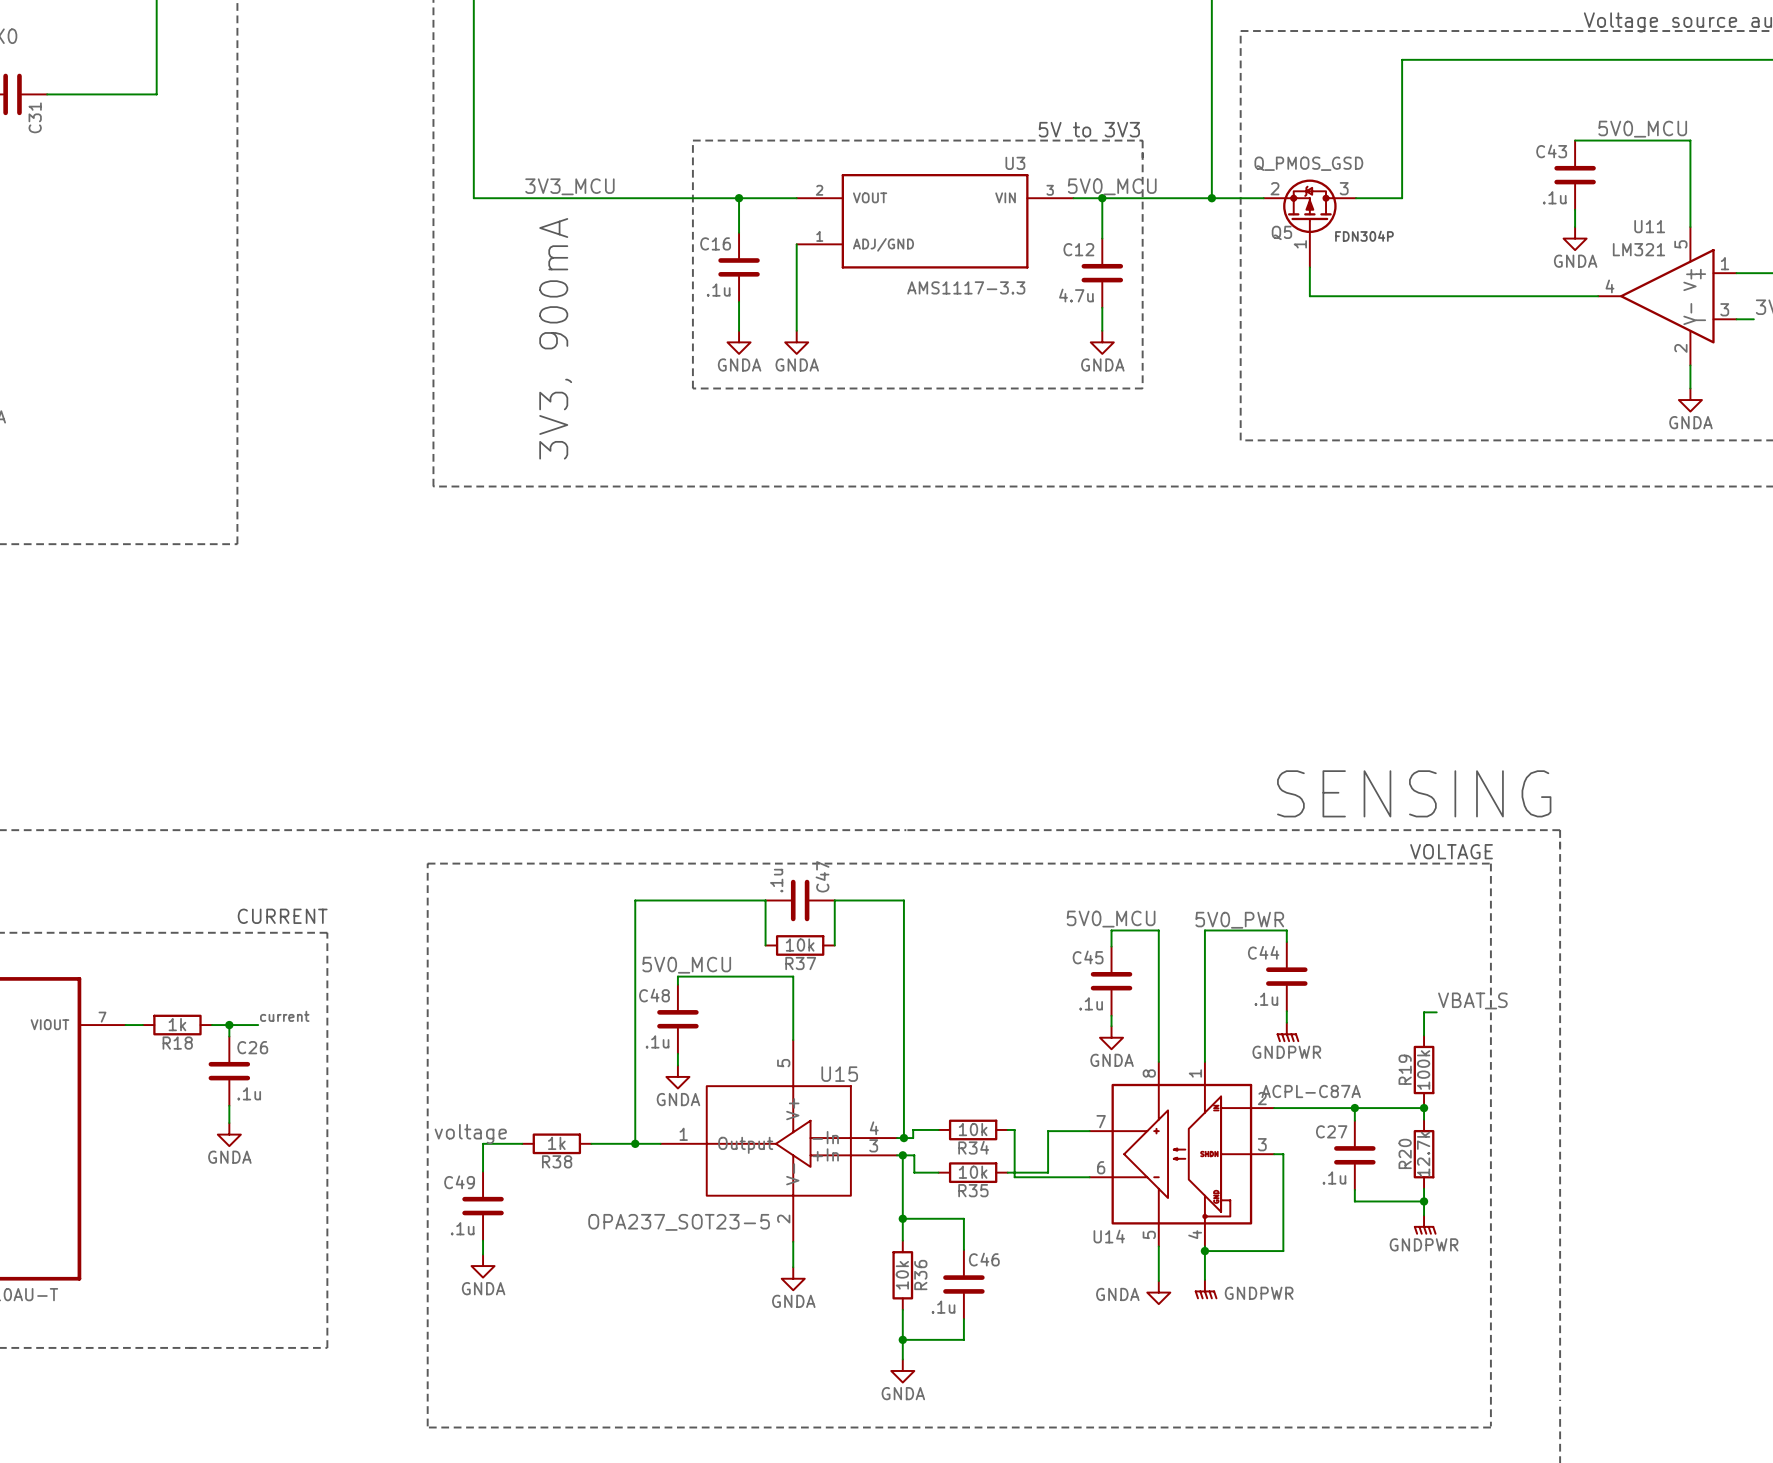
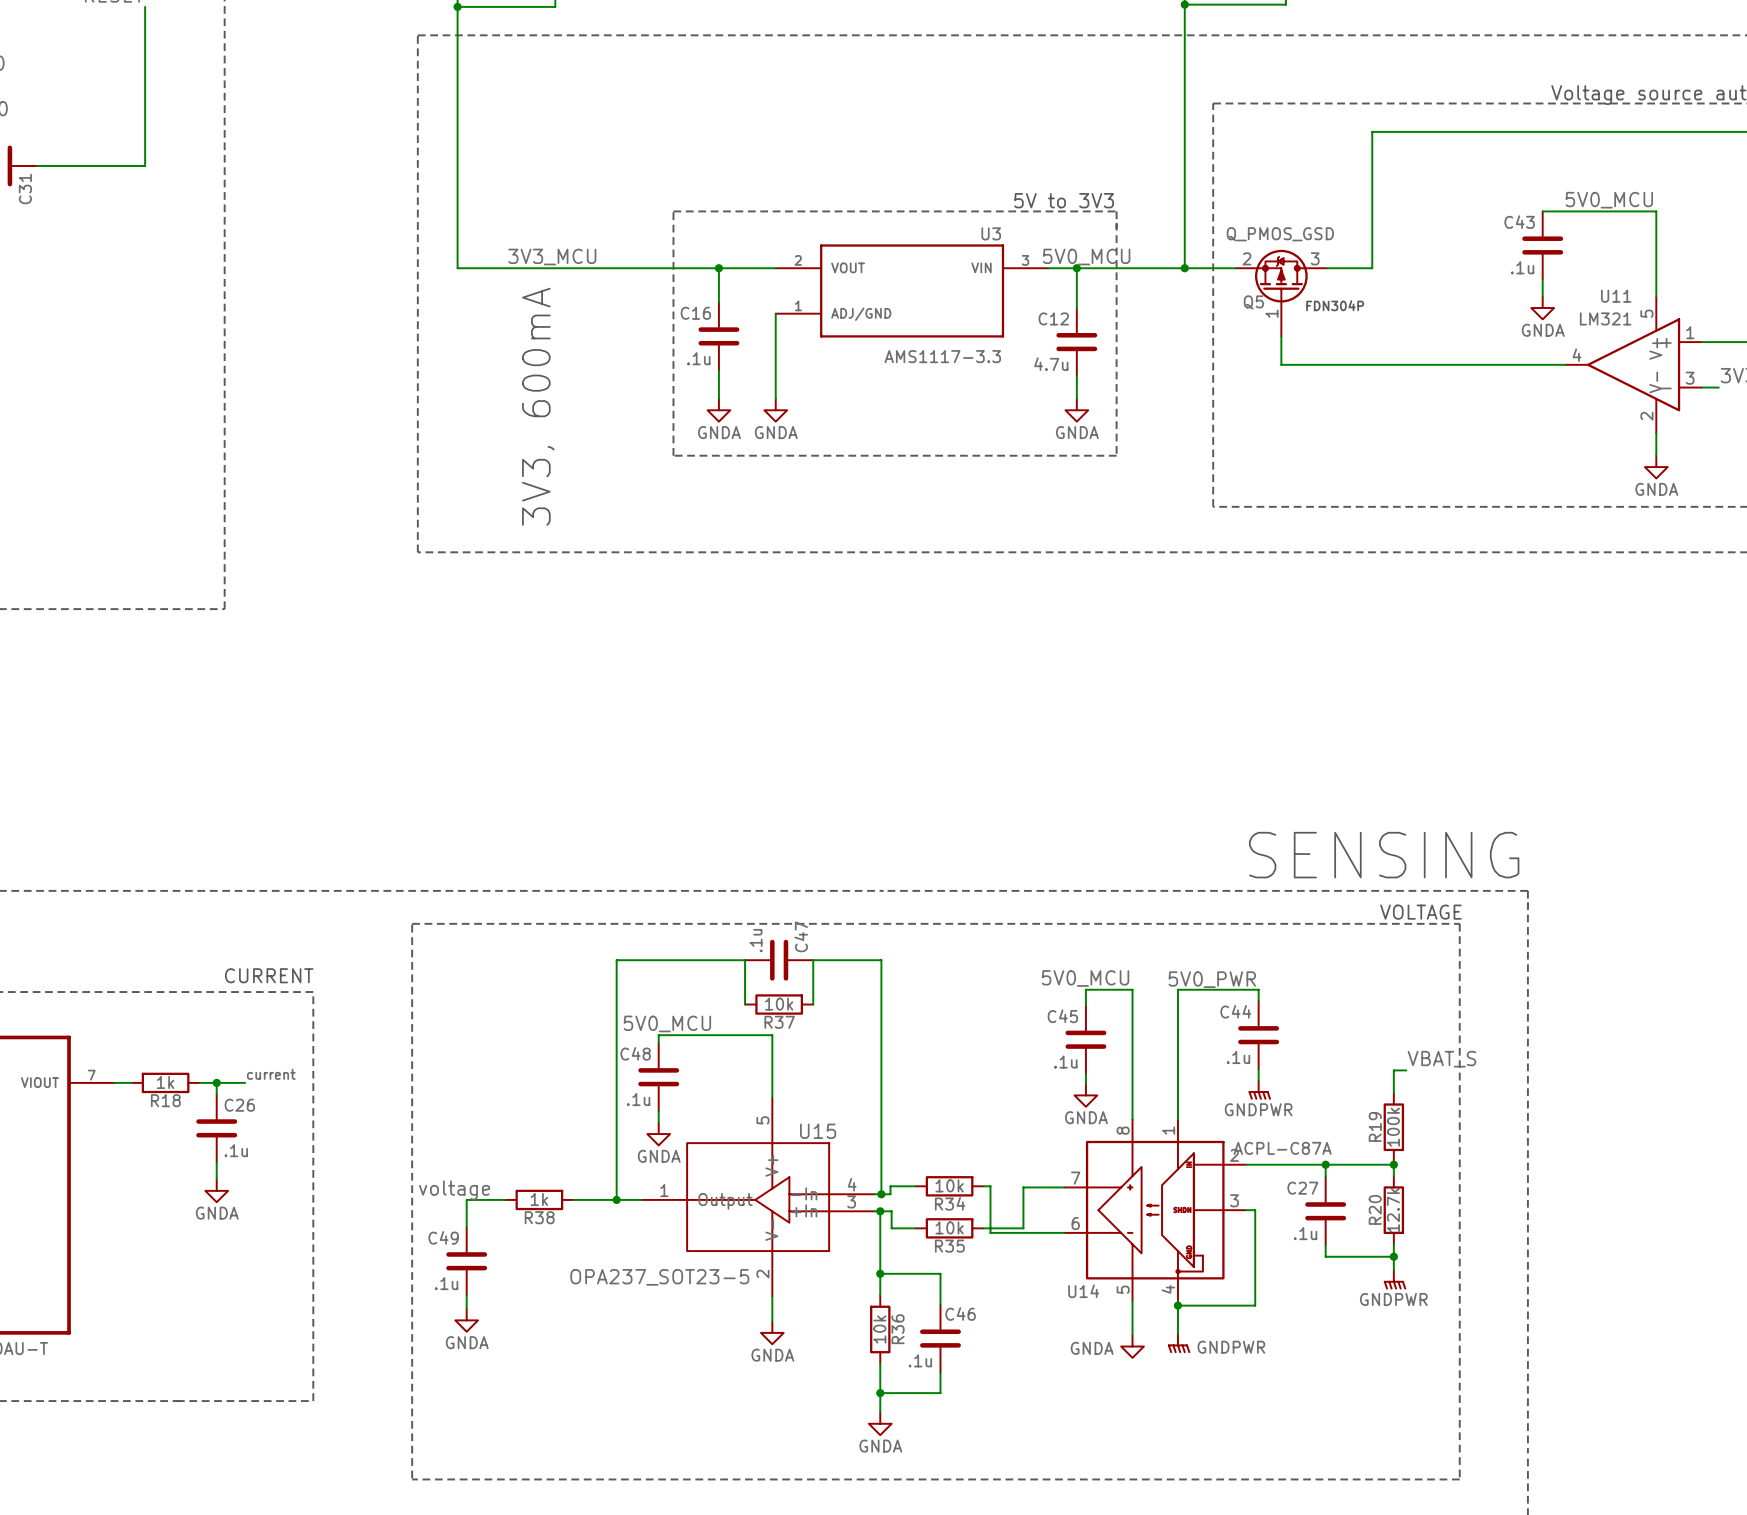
text: 3V3, 900mA (555, 338) -> 3V3, 600mA (538, 406)

